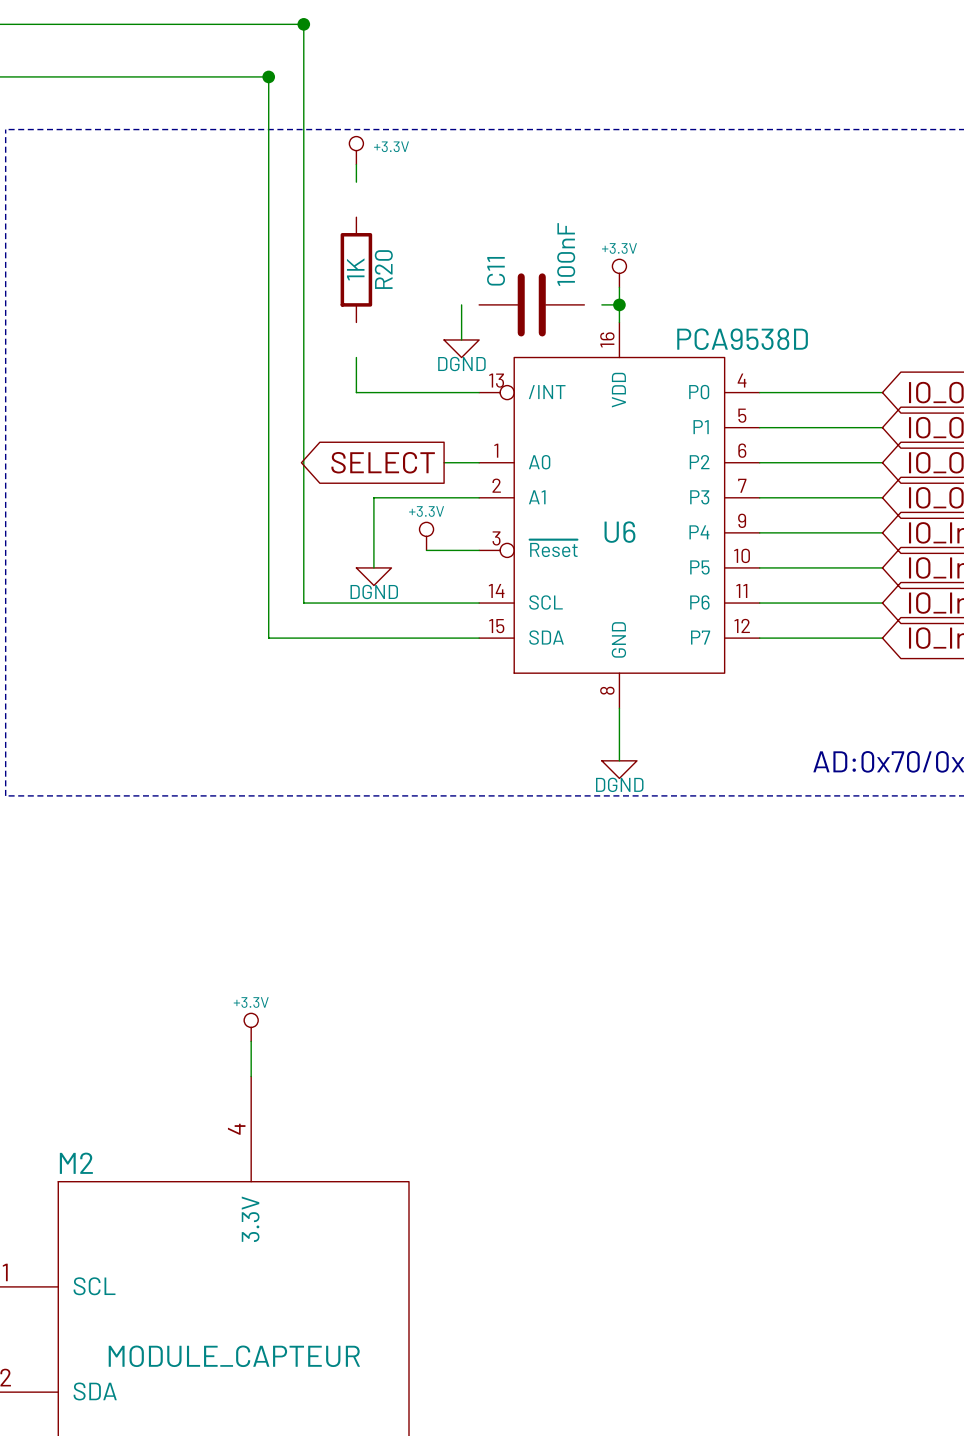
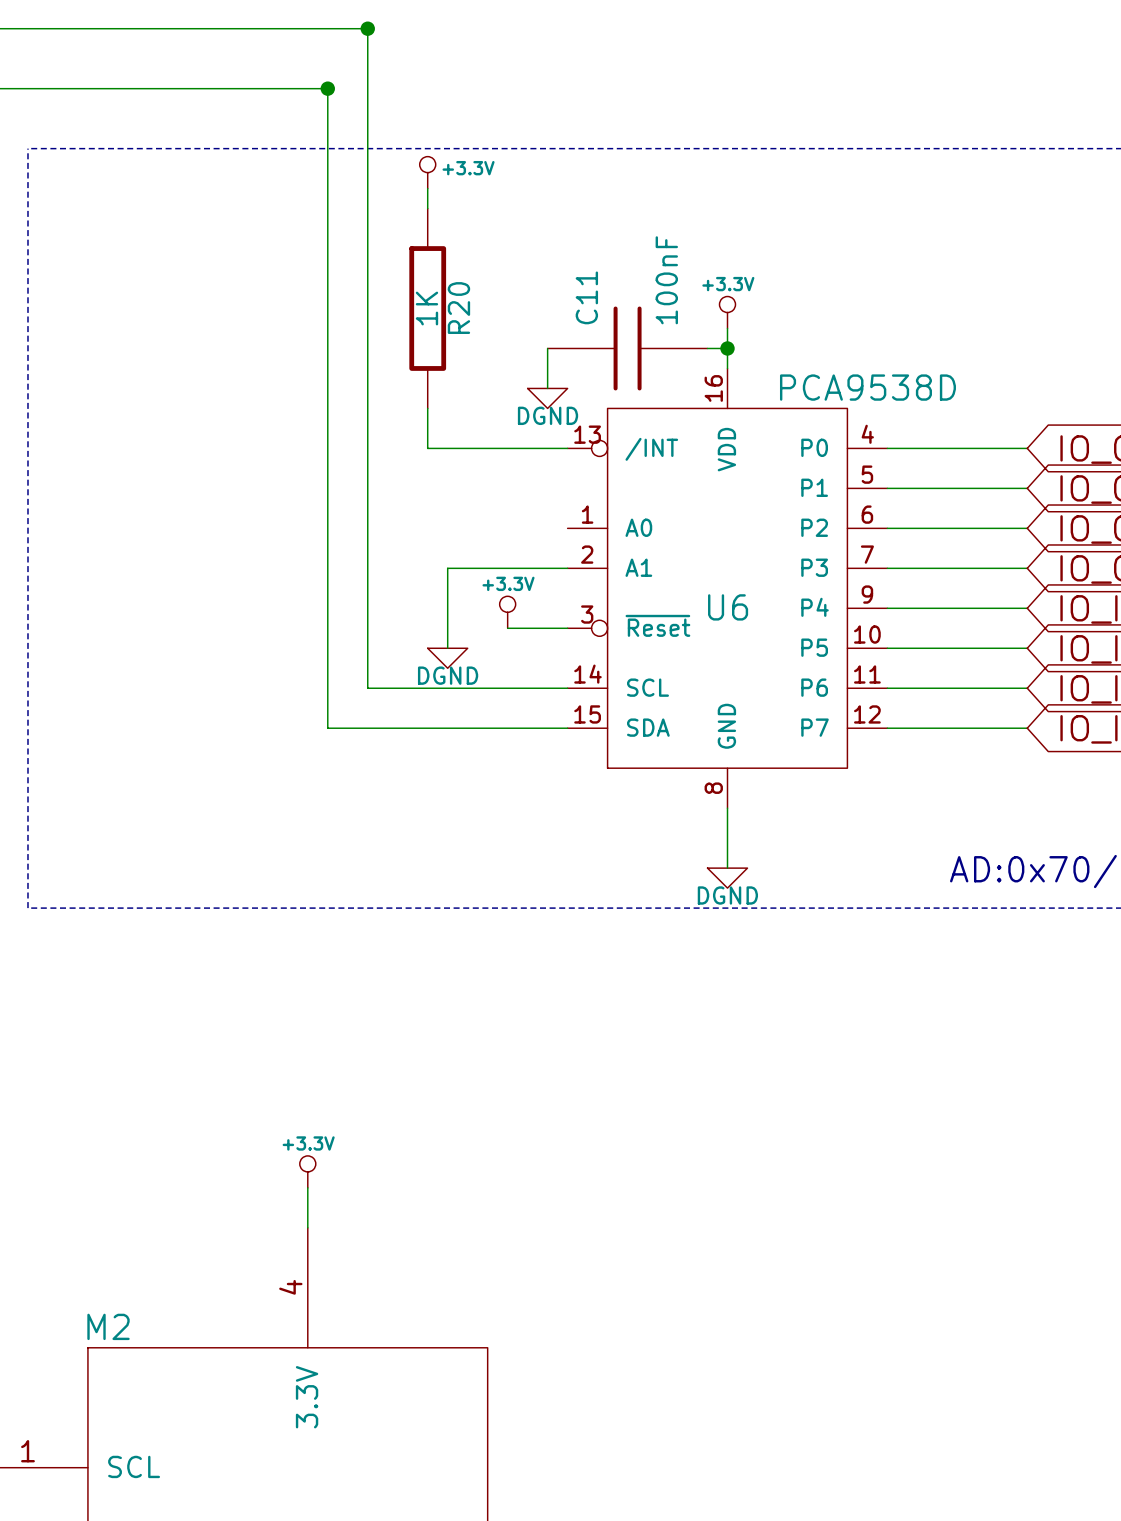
R20 symbol: [340, 217, 373, 323] -> [409, 208, 447, 409]
C11 symbol: [479, 273, 585, 337] -> [547, 306, 708, 391]
global label: SELECT (383, 462) -> none
wire: (444, 462) (479, 462) -> none

